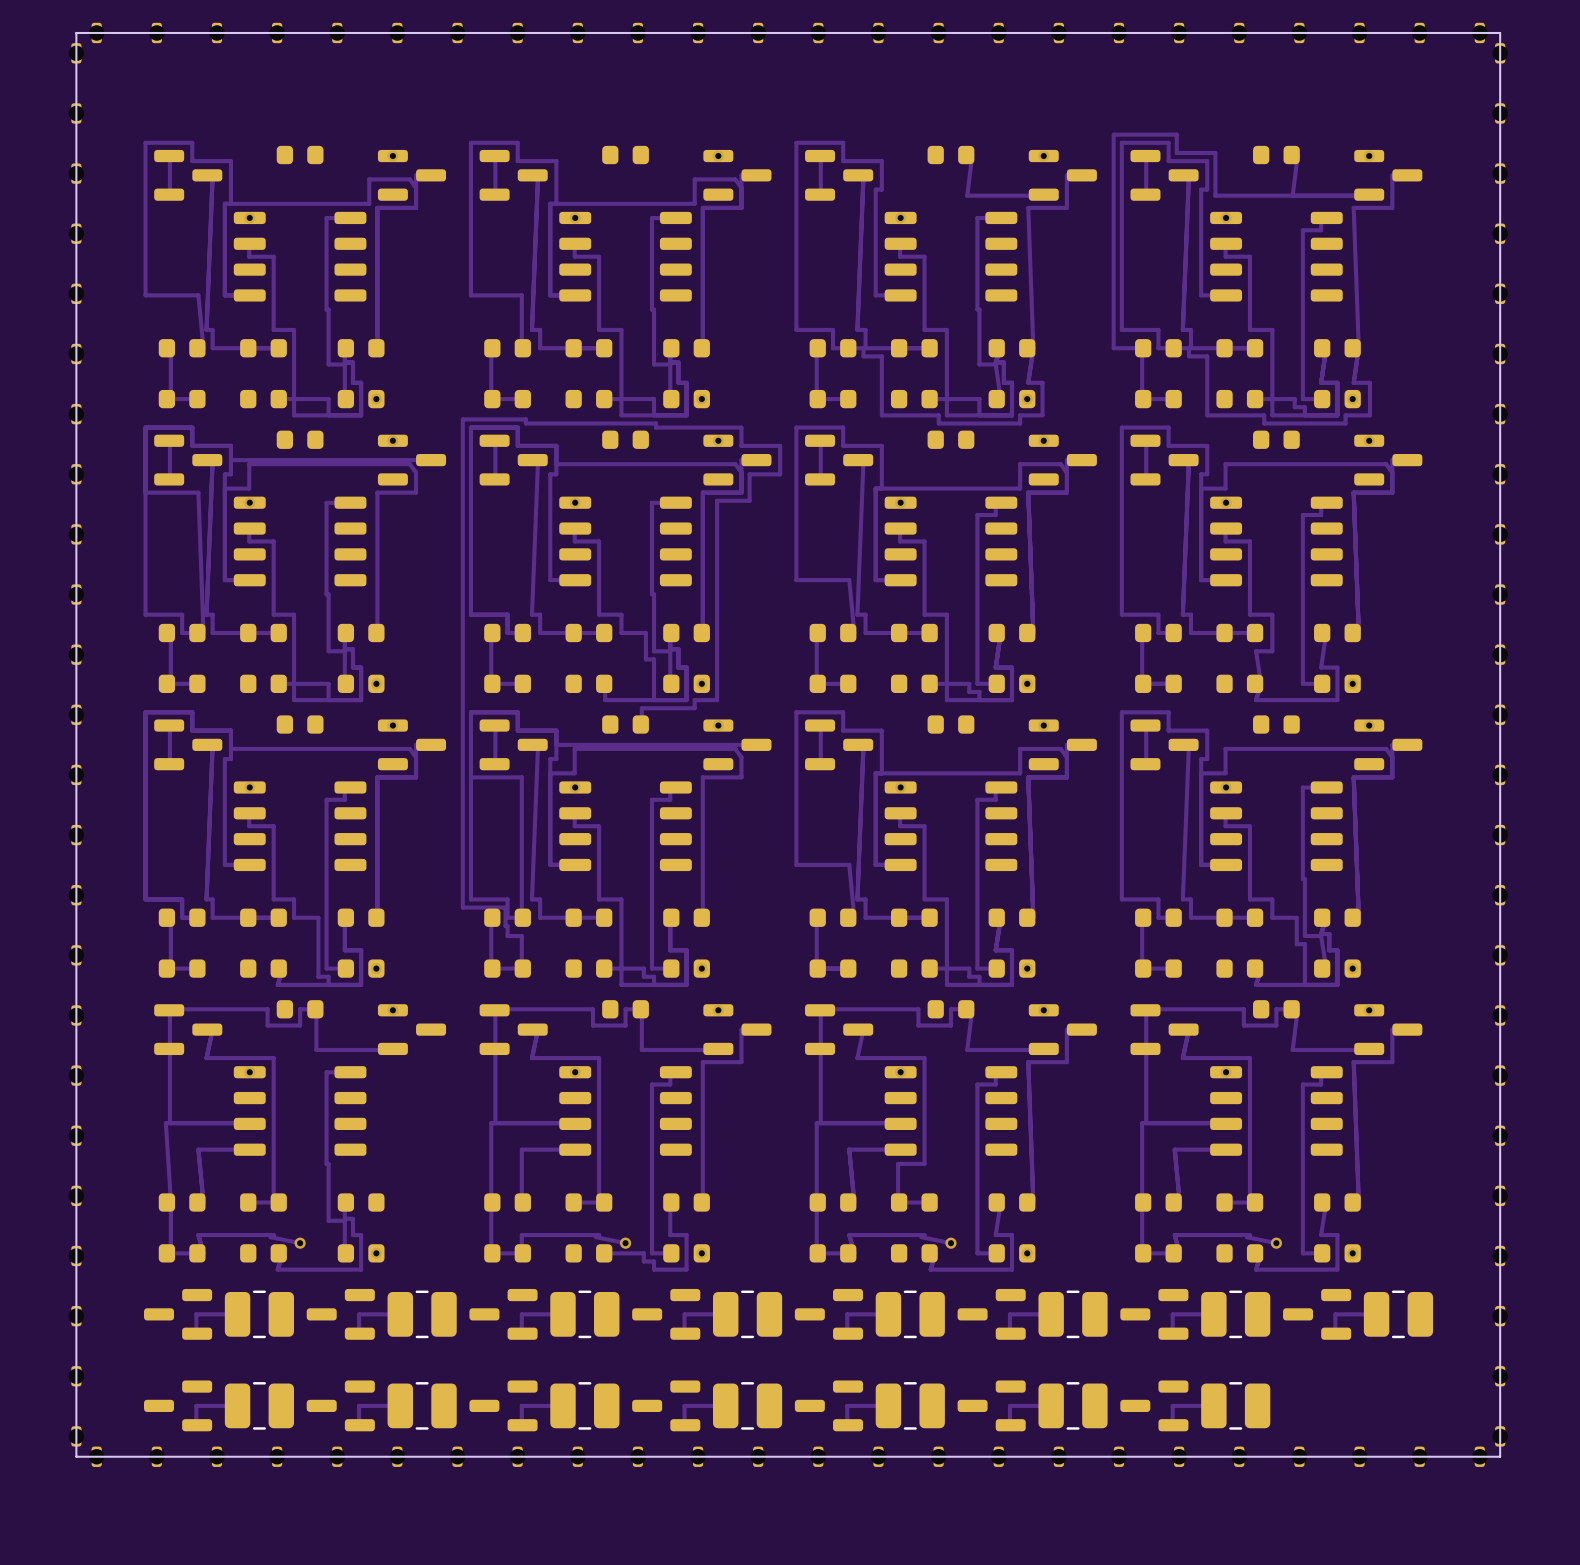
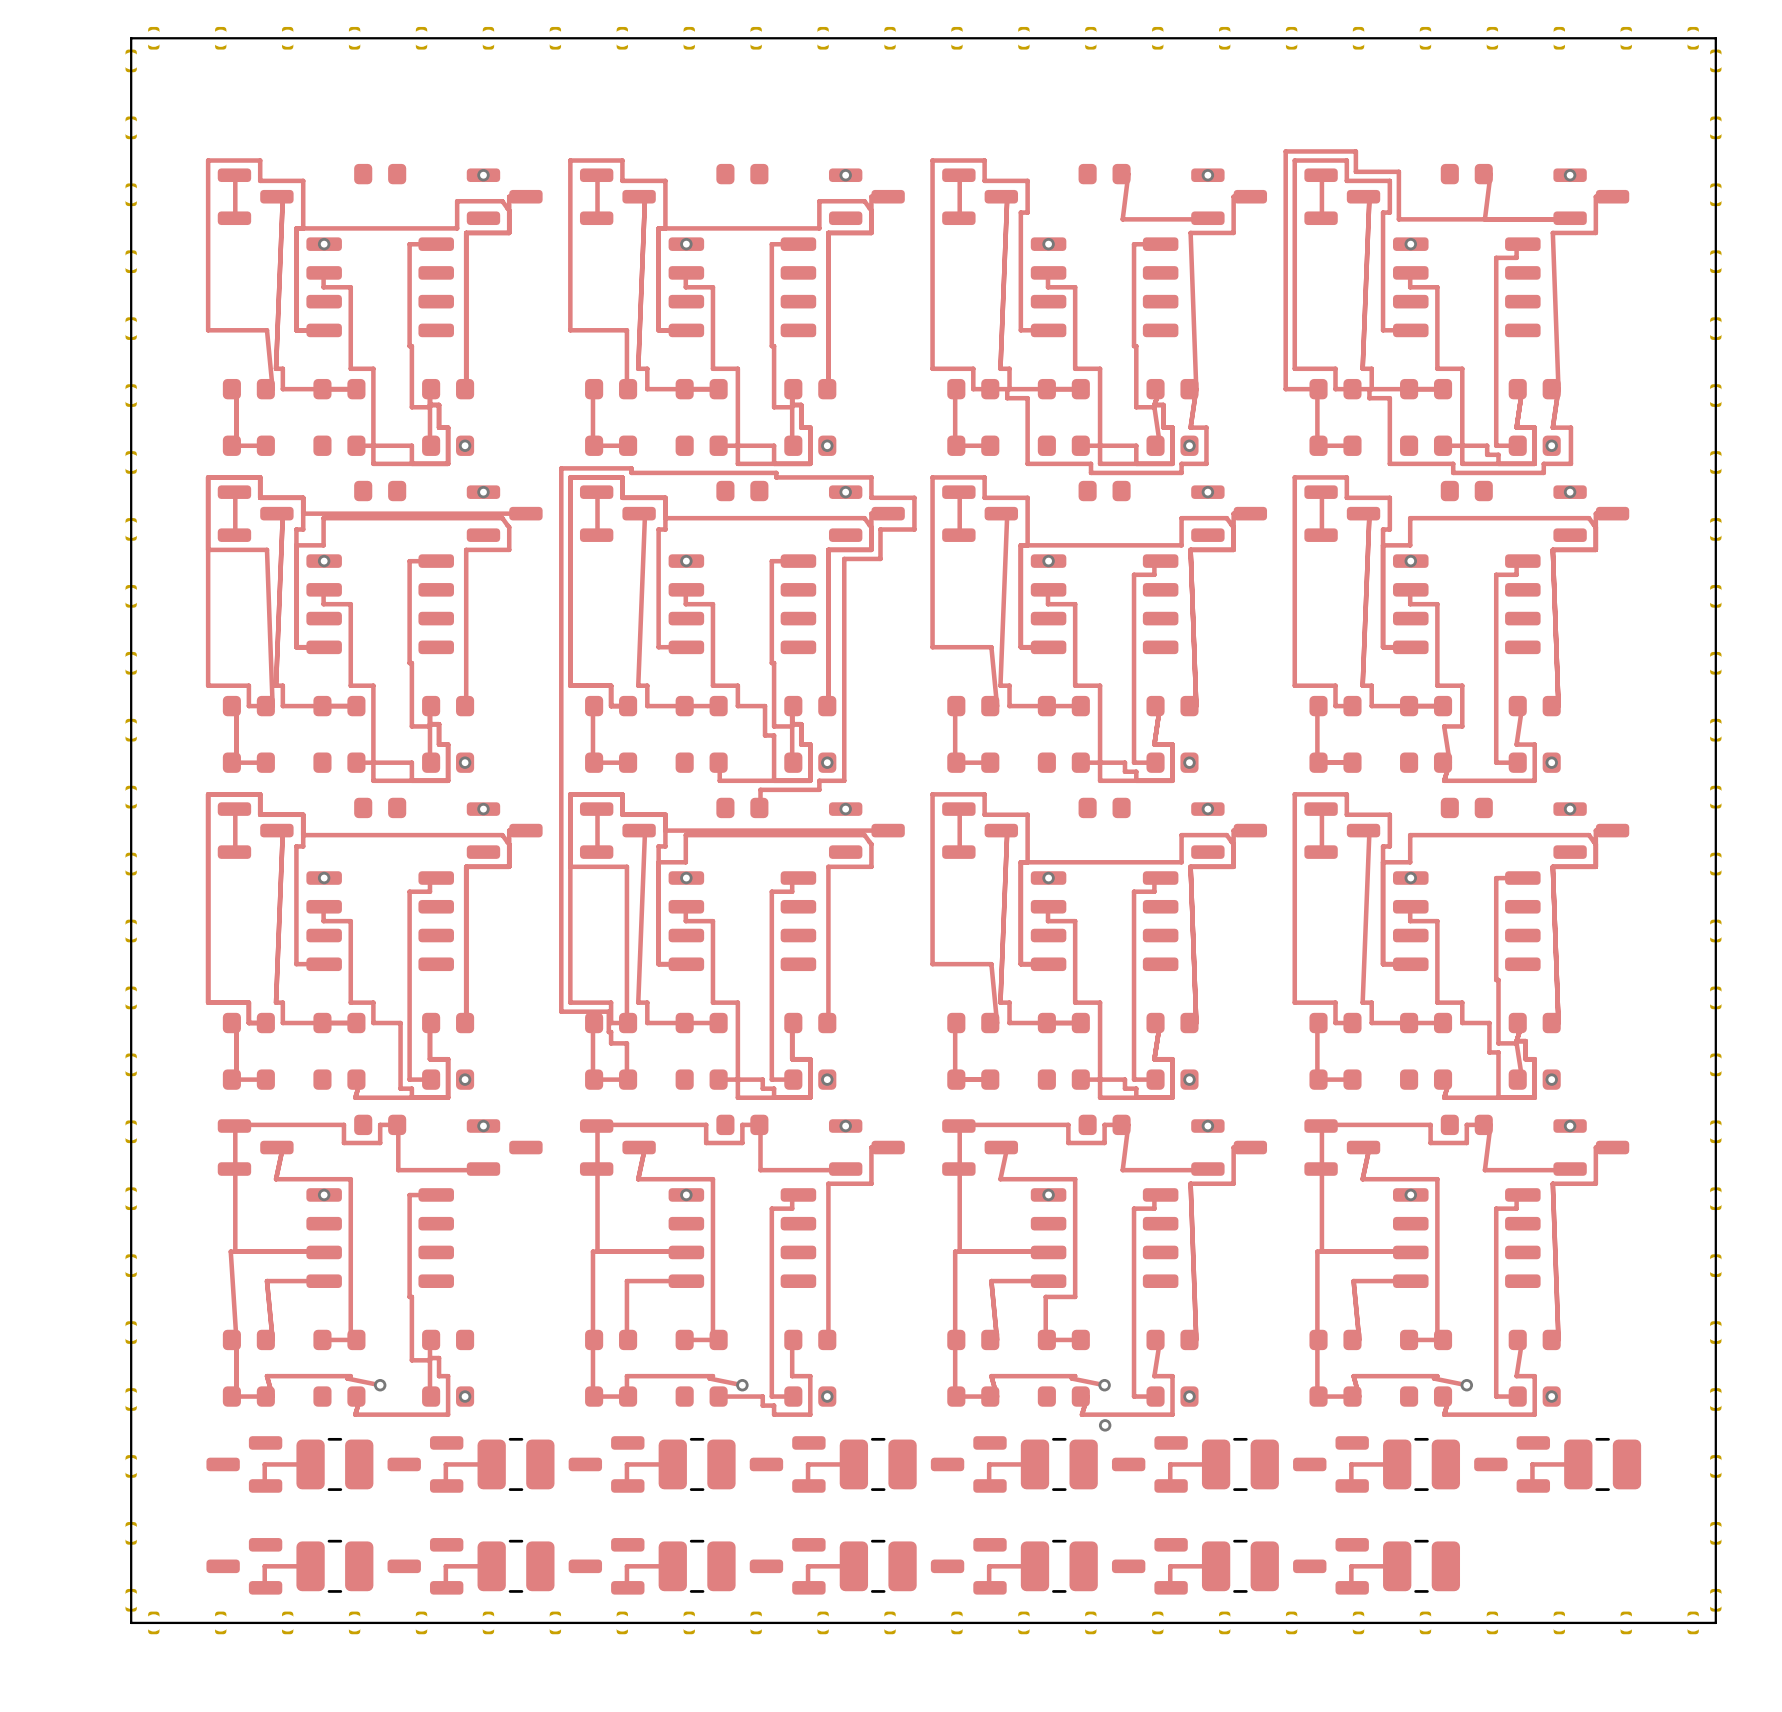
via: none -> (1105, 1425)

